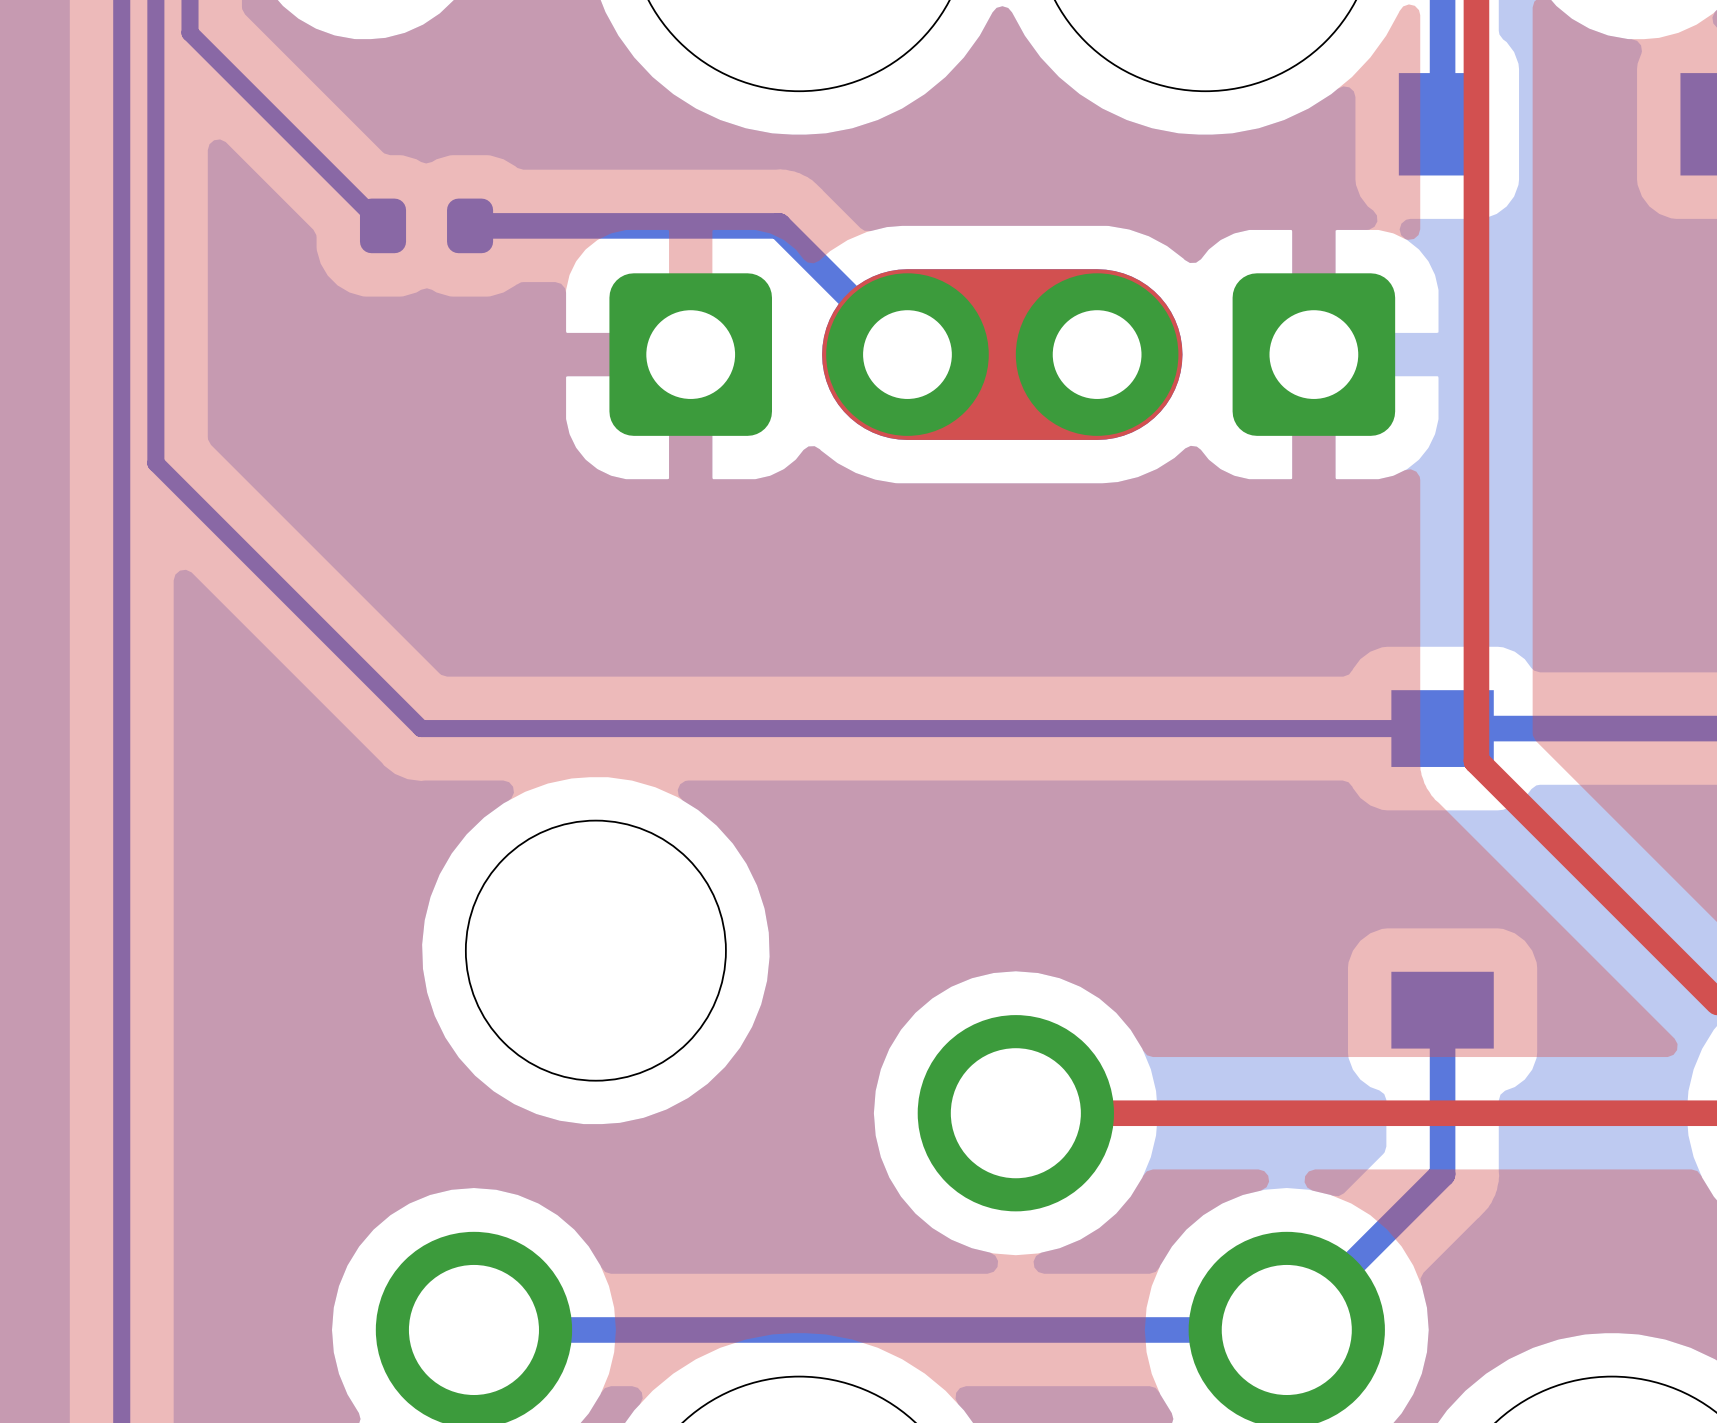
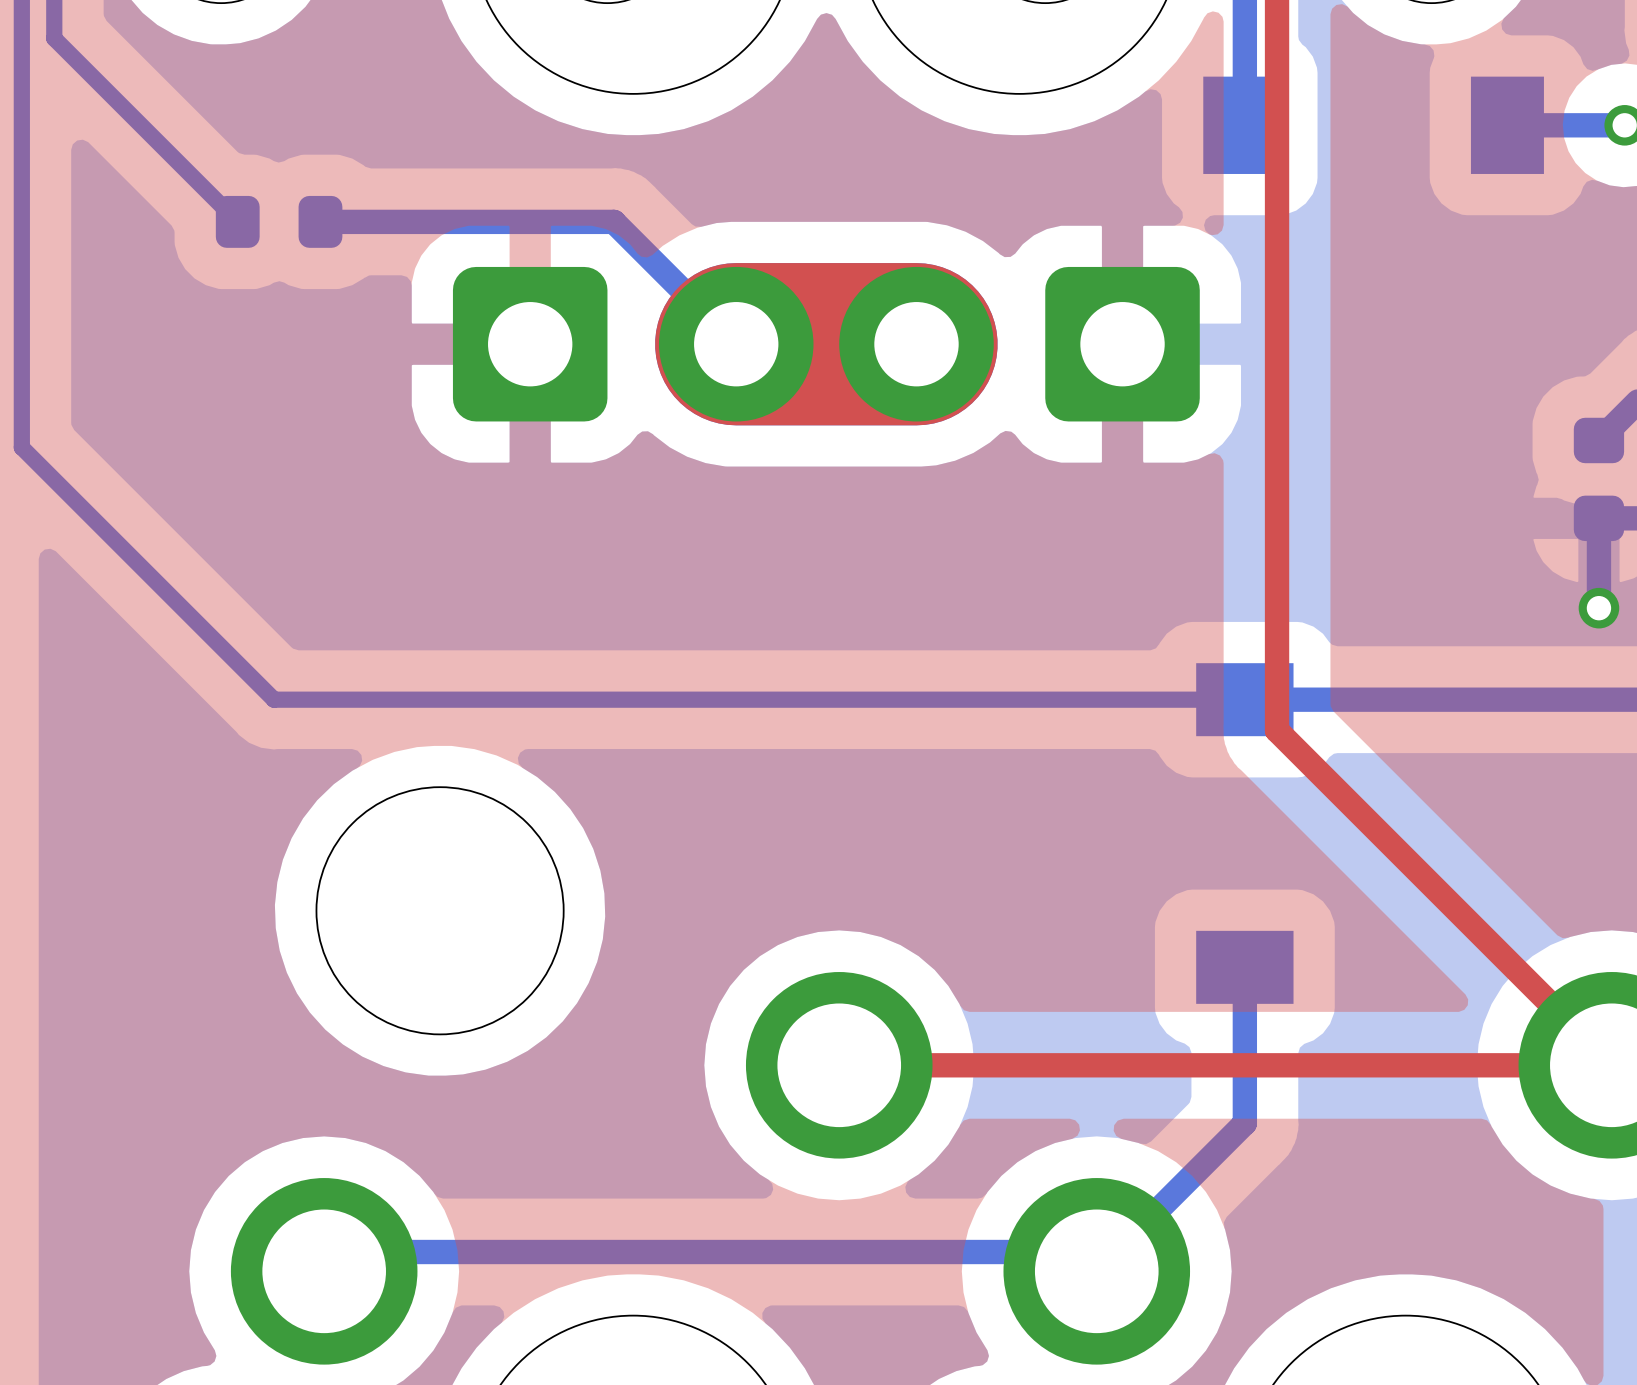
bottom track: (473, 1329) (1286, 1329) -> (324, 1271) (343, 1252) (1077, 1252) (1096, 1271)

